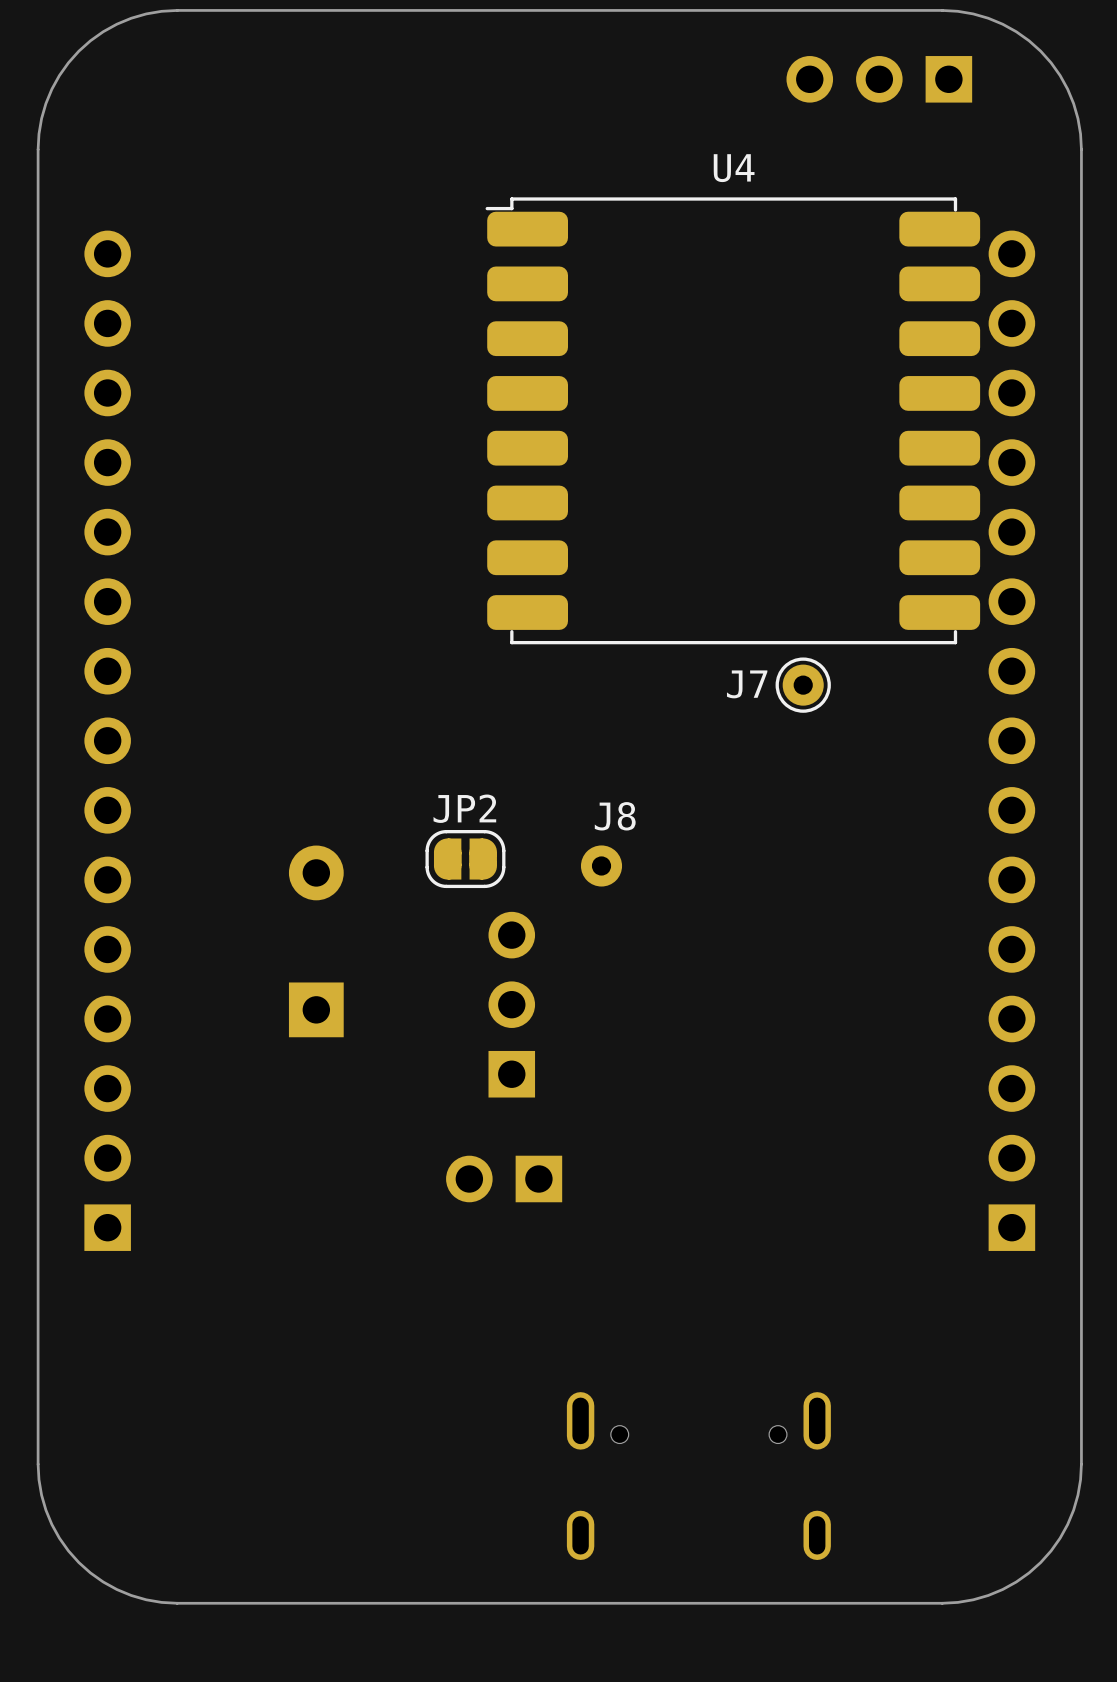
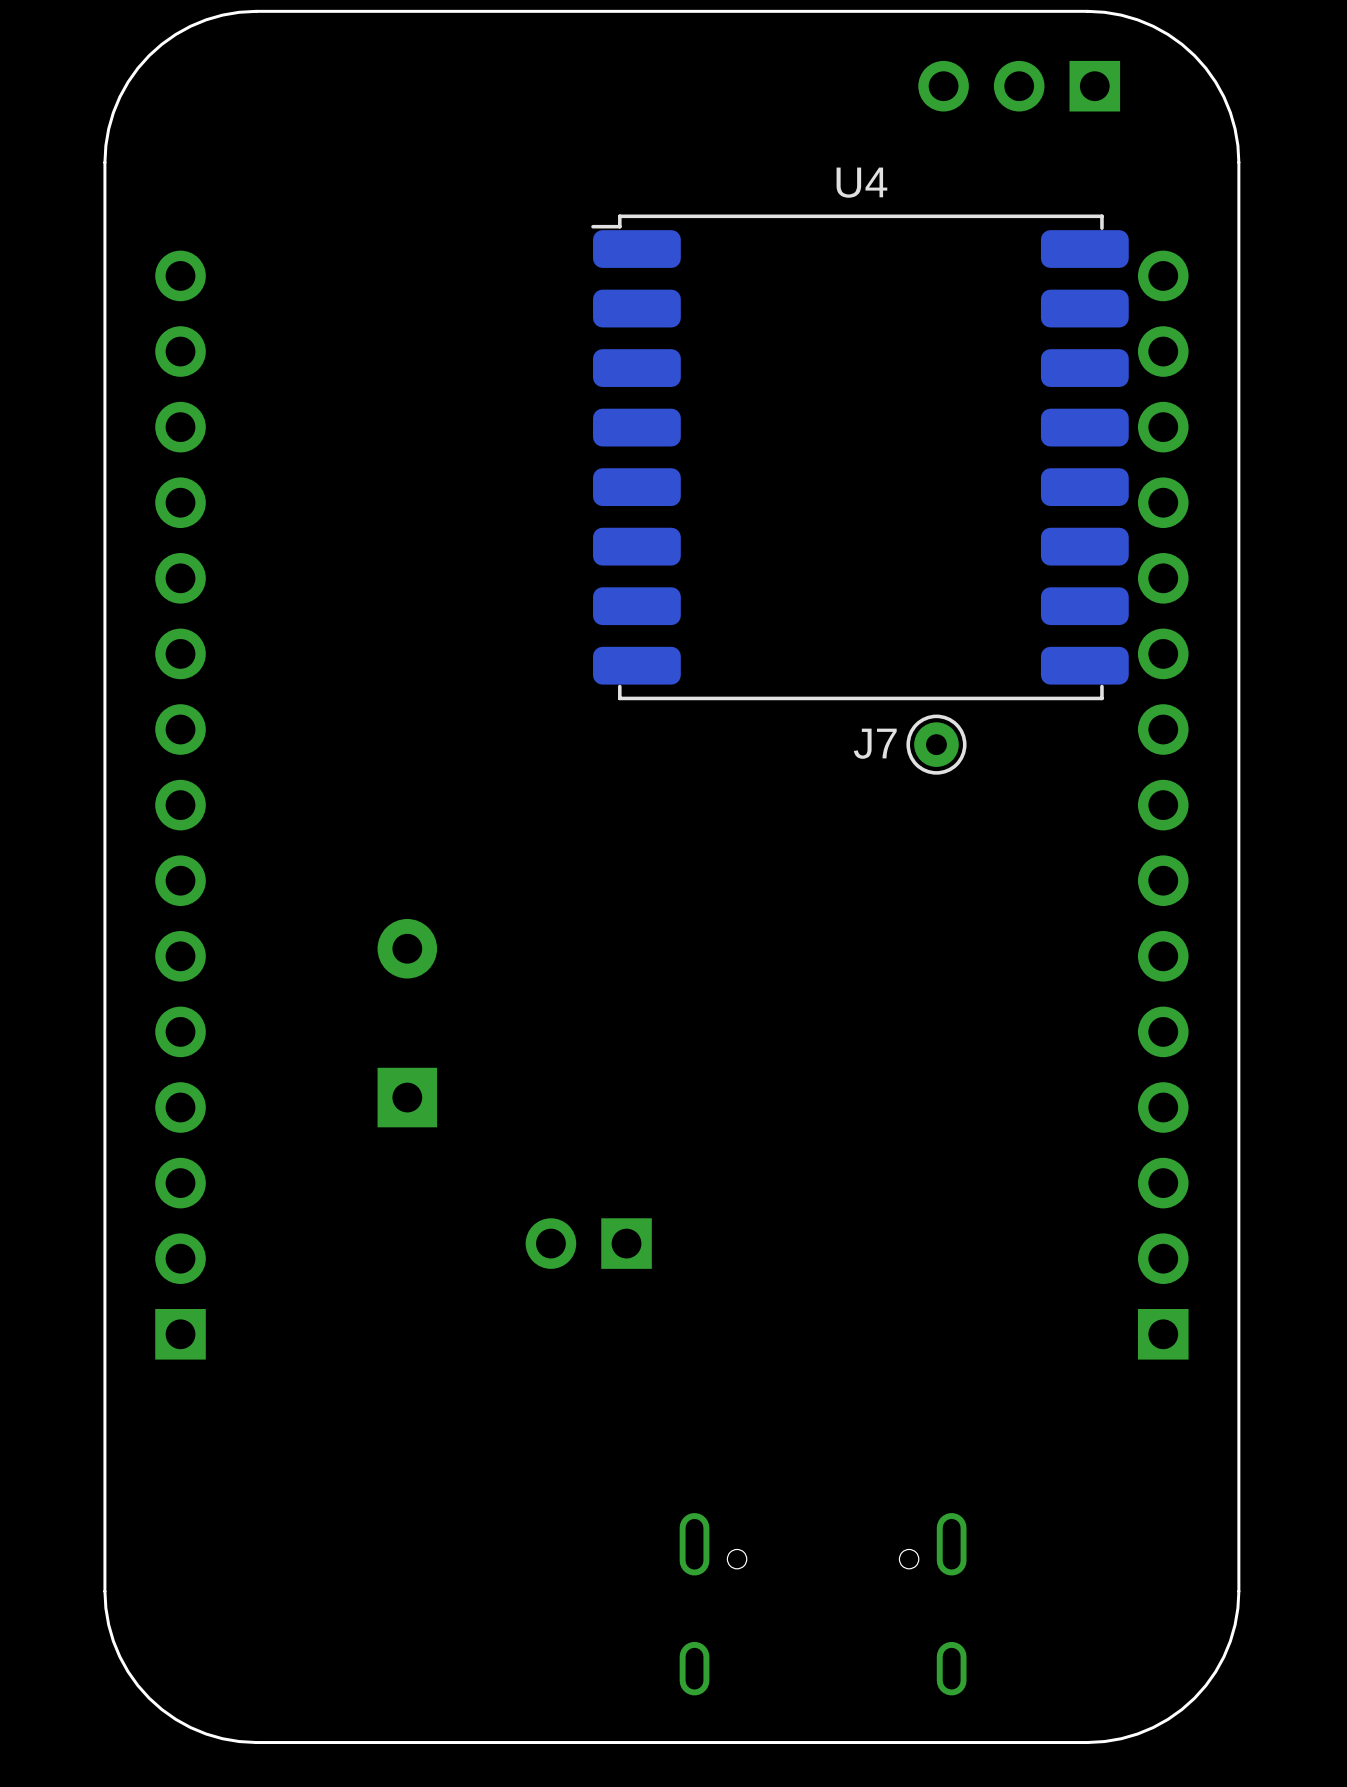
JP2: (465, 859) -> none
J8: (601, 865) -> none
part: (511, 1004) -> none
part position: (504, 1178) -> (588, 1243)

